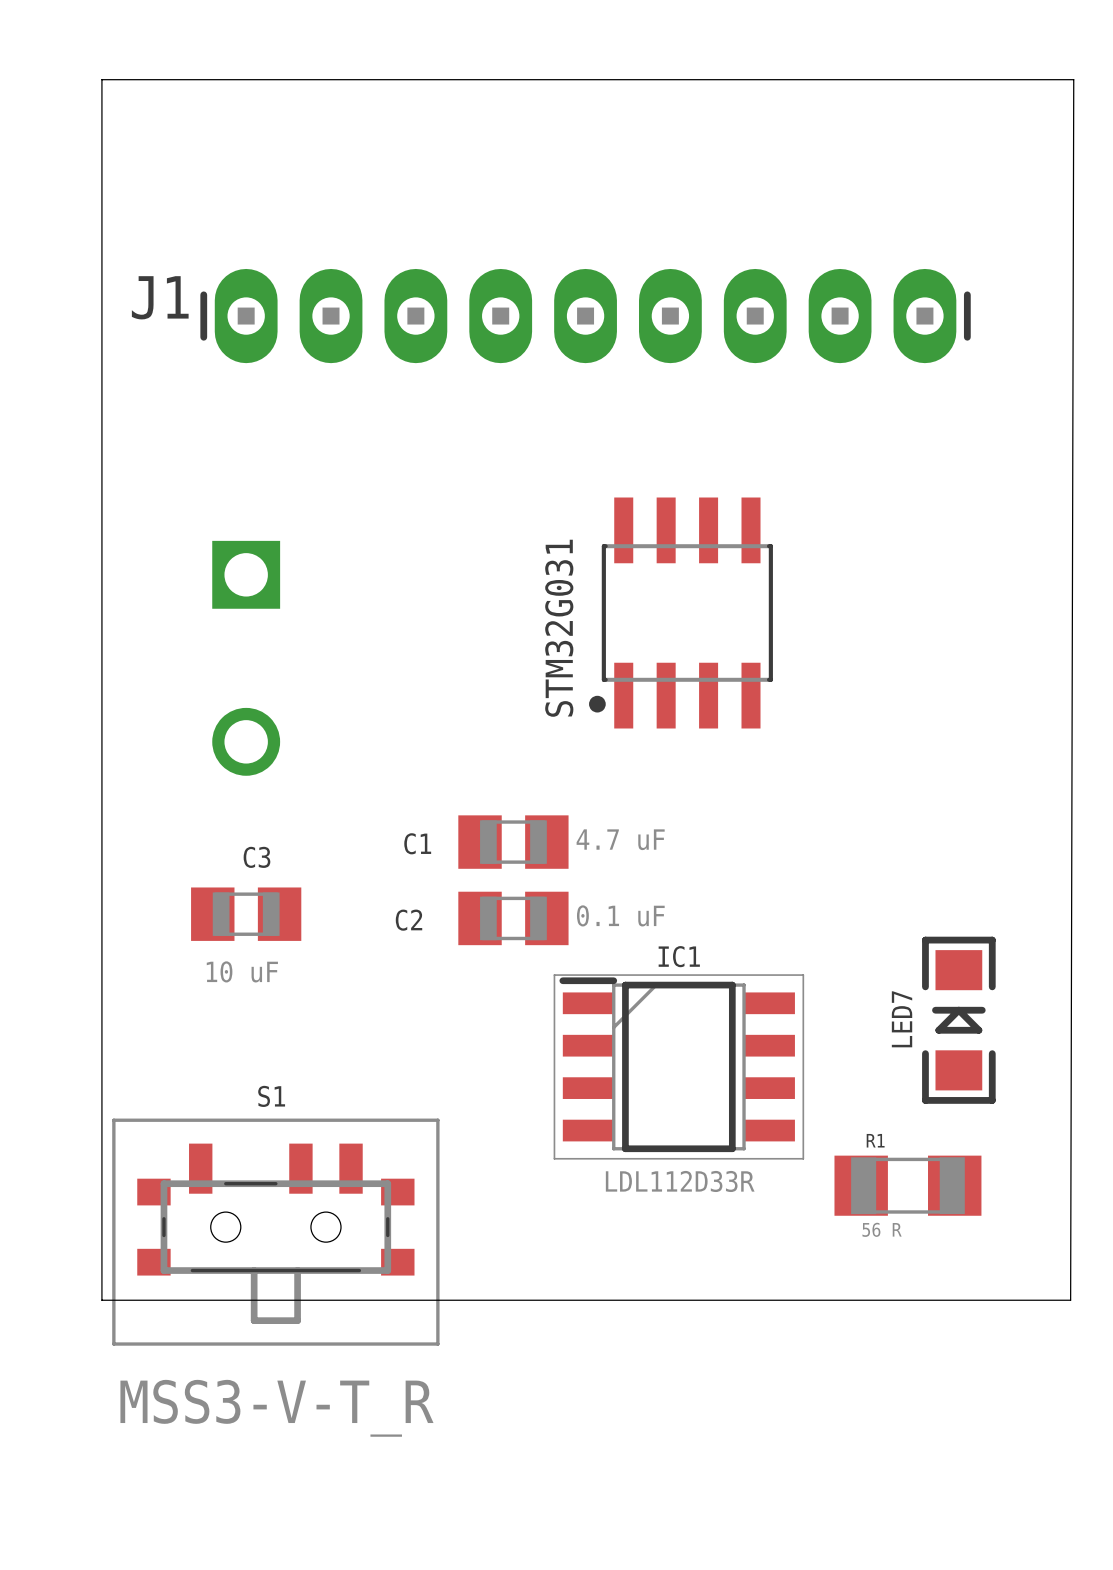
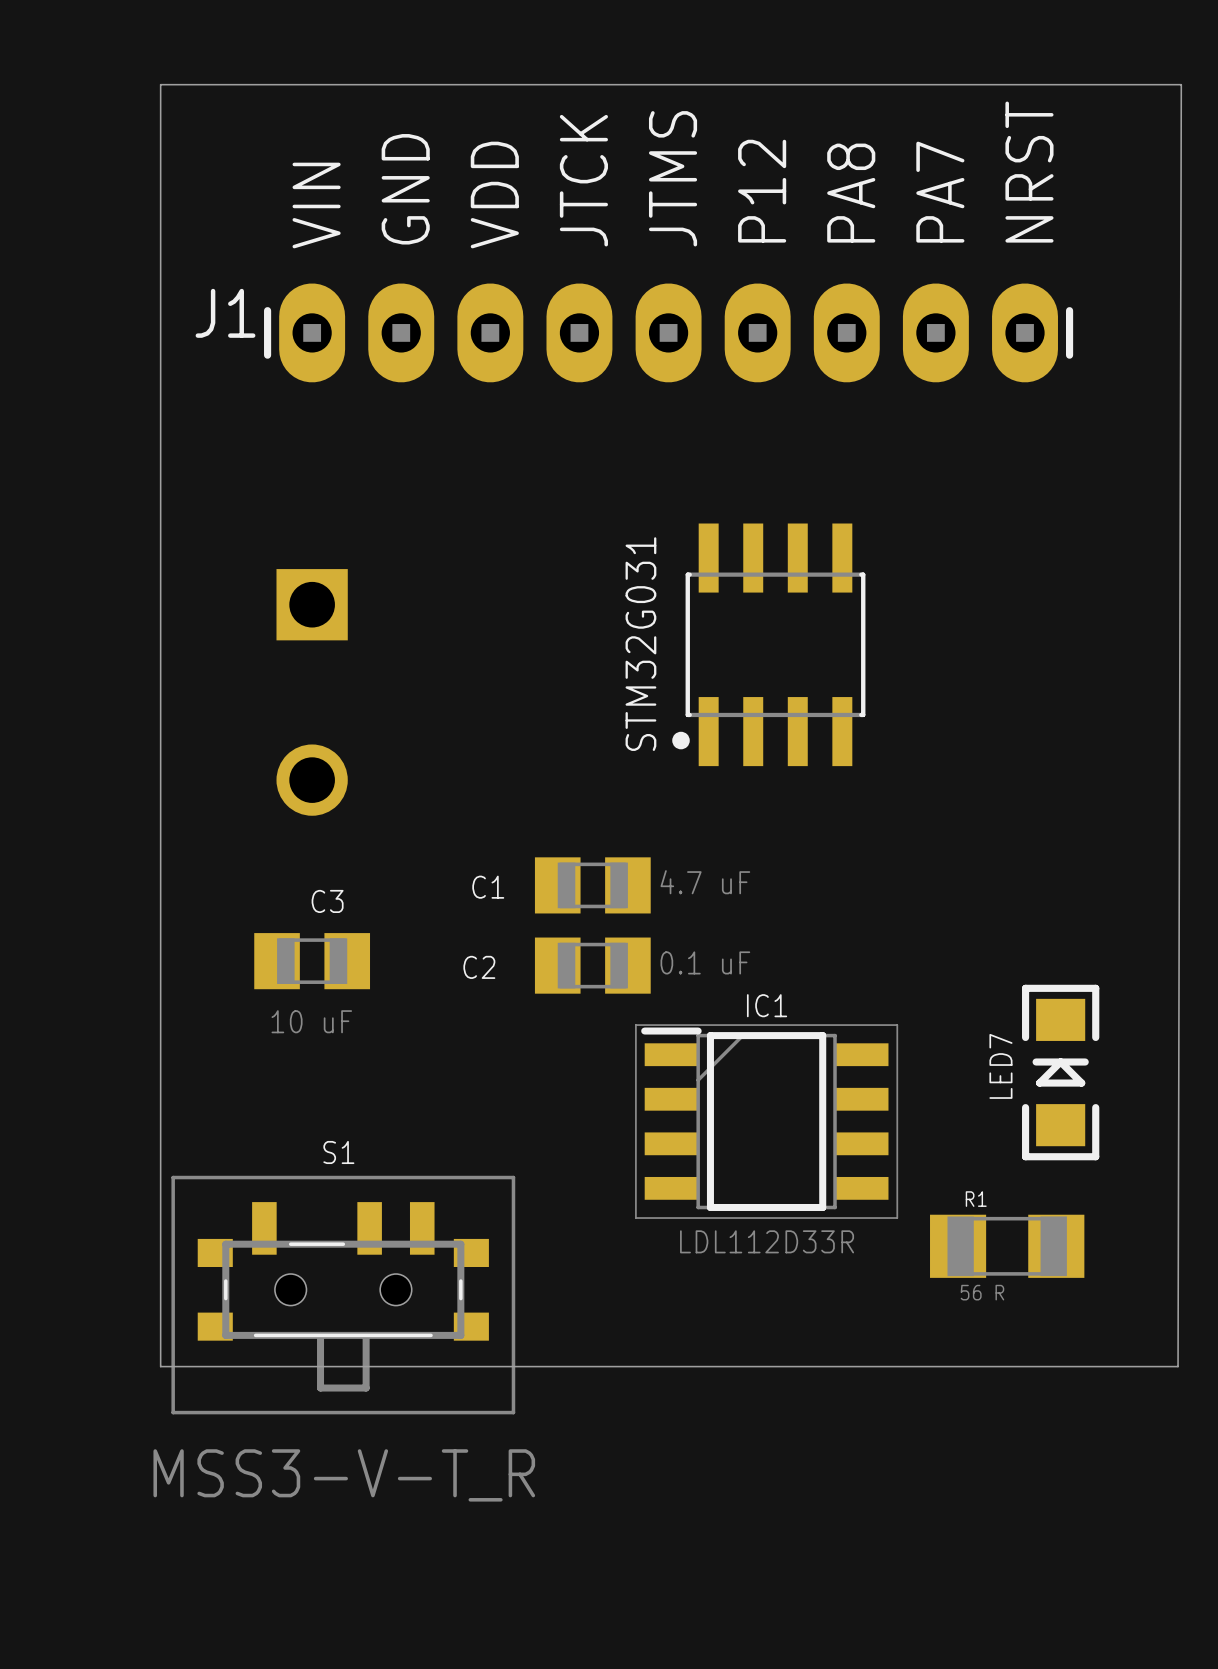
text: none -> JTCK (583, 180)
text: none -> NRST (1029, 172)
text: none -> JTMS (673, 178)
text: none -> PA8 (851, 193)
text: none -> PA7 (940, 192)
text: none -> GND (405, 189)
text: none -> P12 (762, 191)
text: none -> VIN (316, 205)
text: none -> VDD (494, 195)

